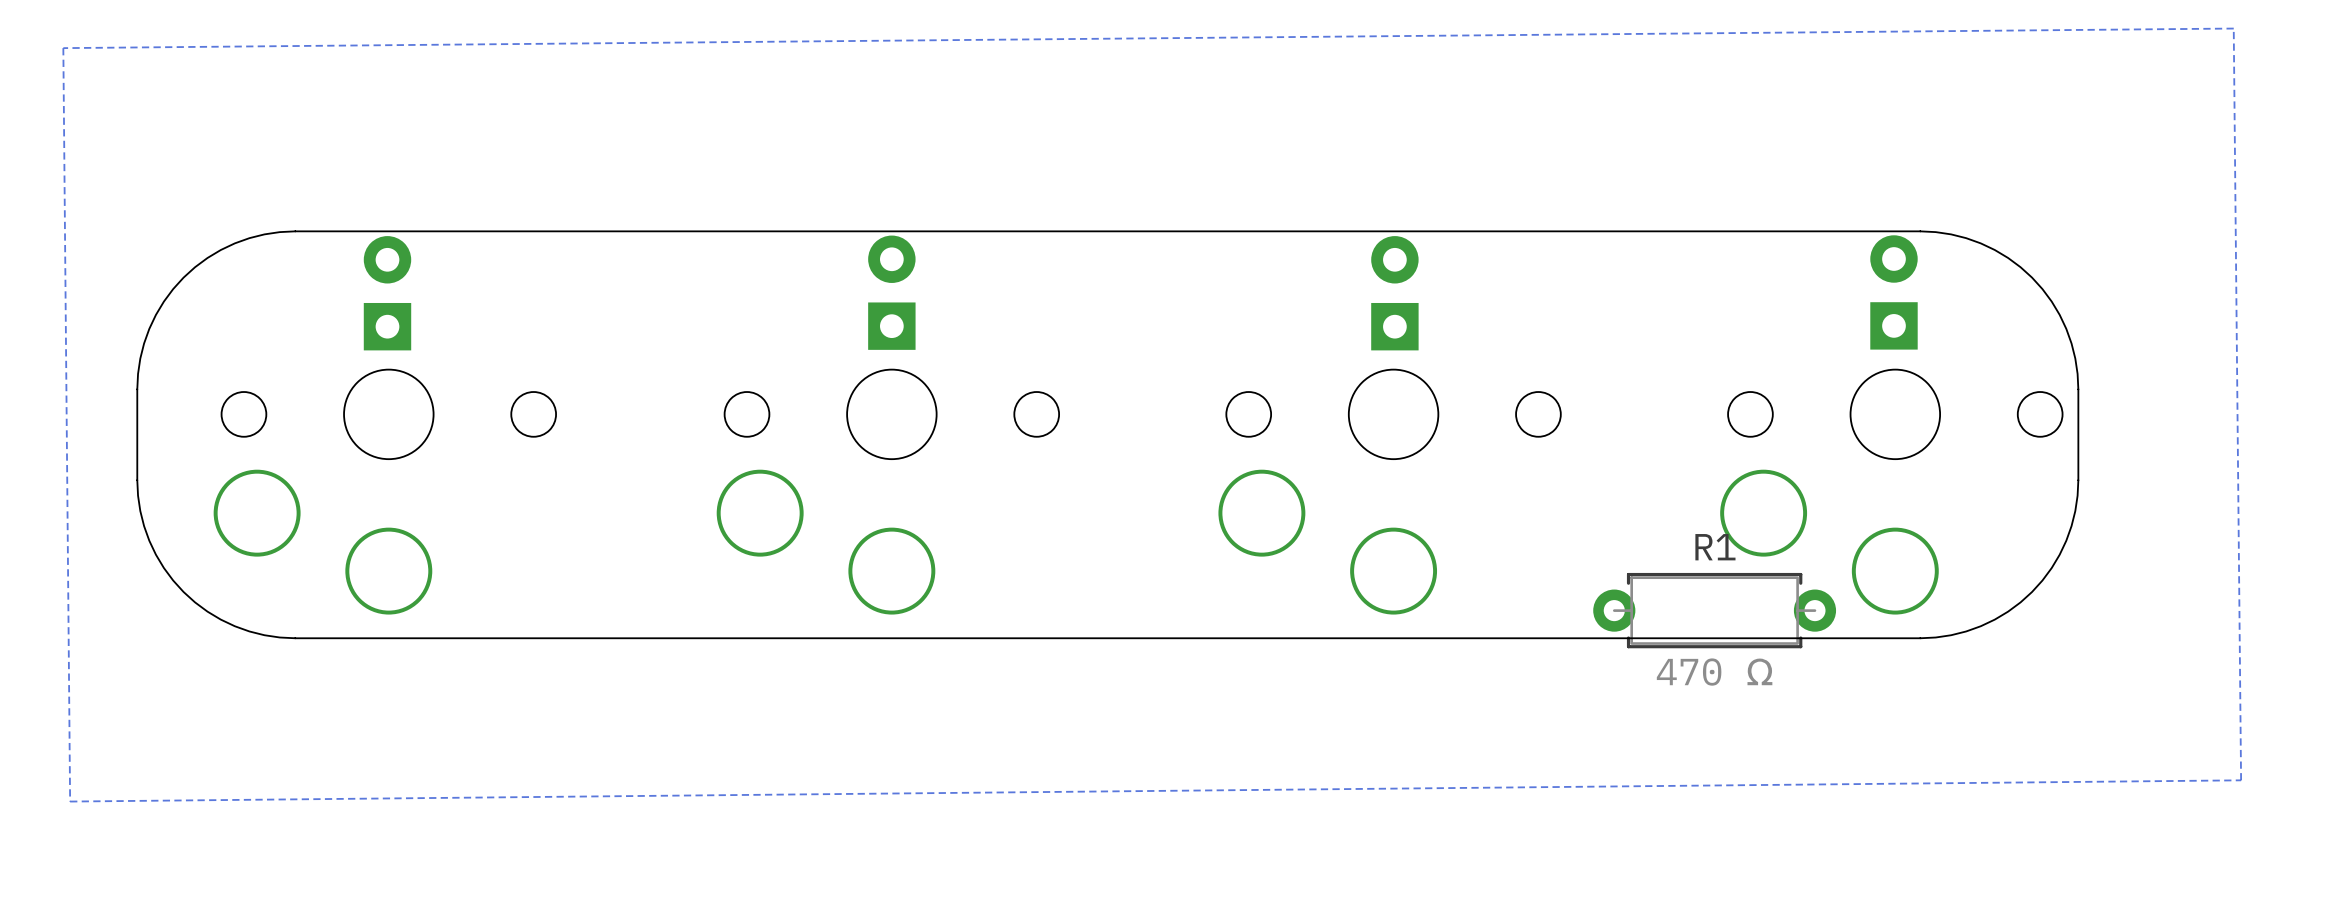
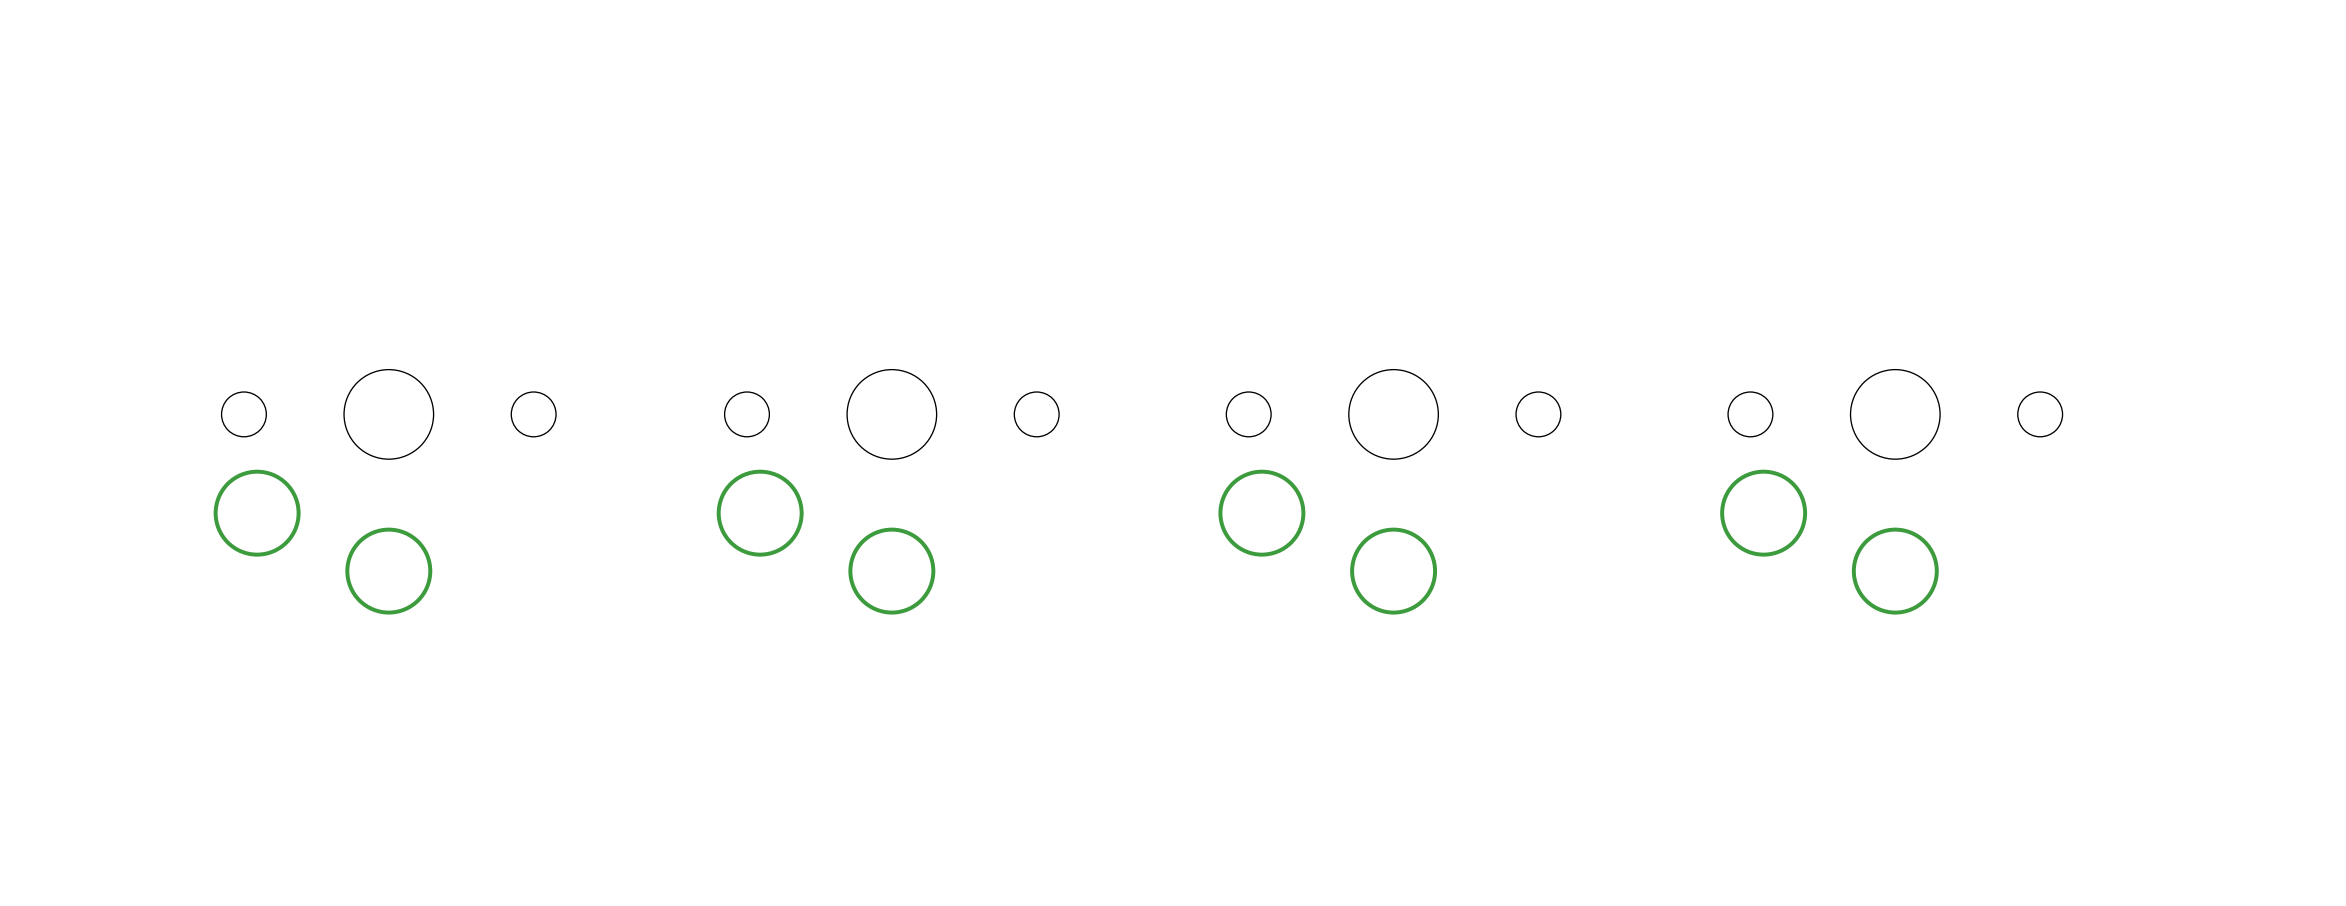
zone outline: (2233, 28) (63, 48) (70, 801) (2241, 780) (2233, 28) -> none
board edge: (1920, 231) (295, 231) (264, 234) (234, 243) (220, 250) (195, 267) (183, 277) (163, 301) (149, 328) (140, 358) (138, 373) (137, 480) (140, 511) (149, 540) (163, 568) (173, 580) (195, 602) (220, 619) (234, 626) (264, 635) (279, 637) (1920, 638) (1951, 635) (1980, 626) (2008, 611) (2032, 591) (2051, 568) (2059, 554) (2071, 526) (2077, 495) (2077, 373) (2071, 343) (2066, 328) (2051, 301) (2032, 277) (2008, 257) (1980, 243) (1951, 234) (1920, 231) -> none
part: (891, 292) -> none
part: (1893, 292) -> none
part: (387, 293) -> none
part: (1394, 293) -> none
R1: 470 Ω (1714, 610) -> none

